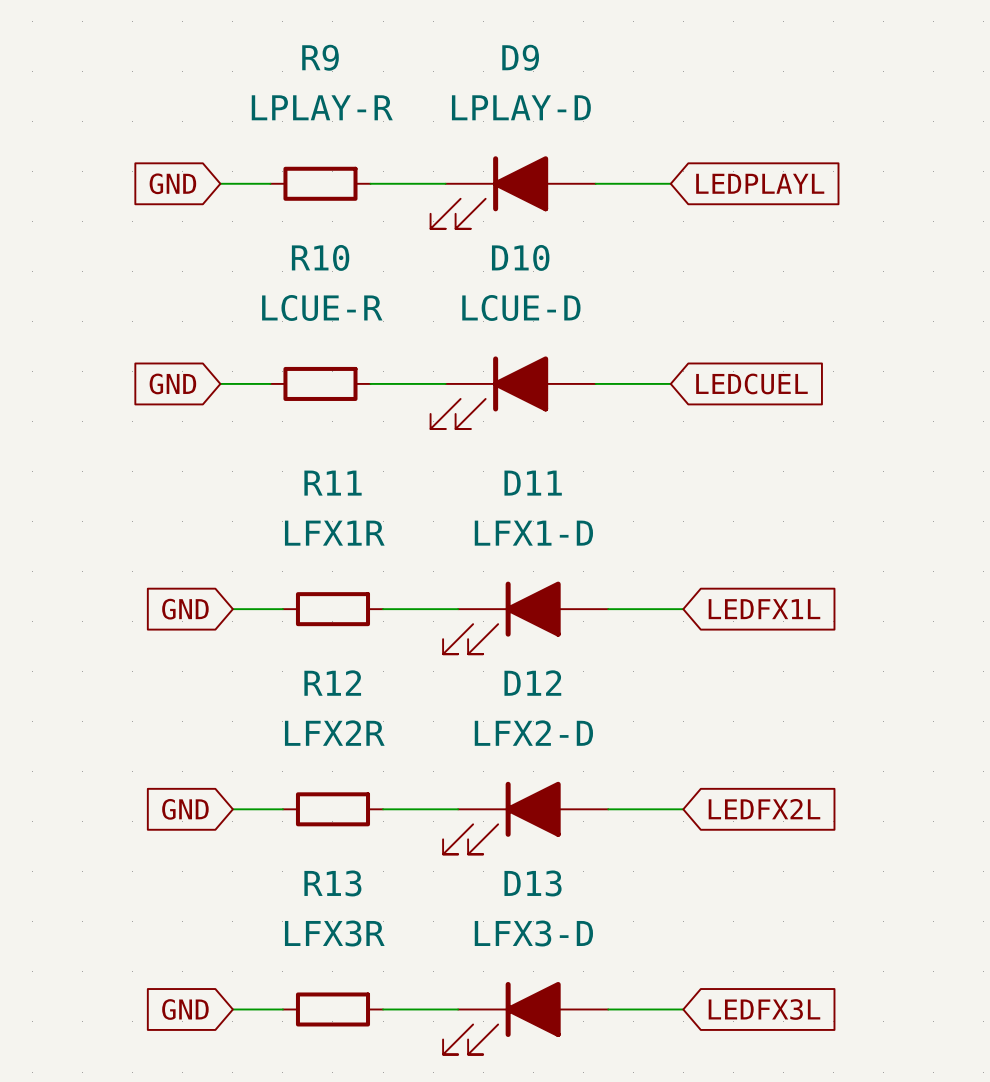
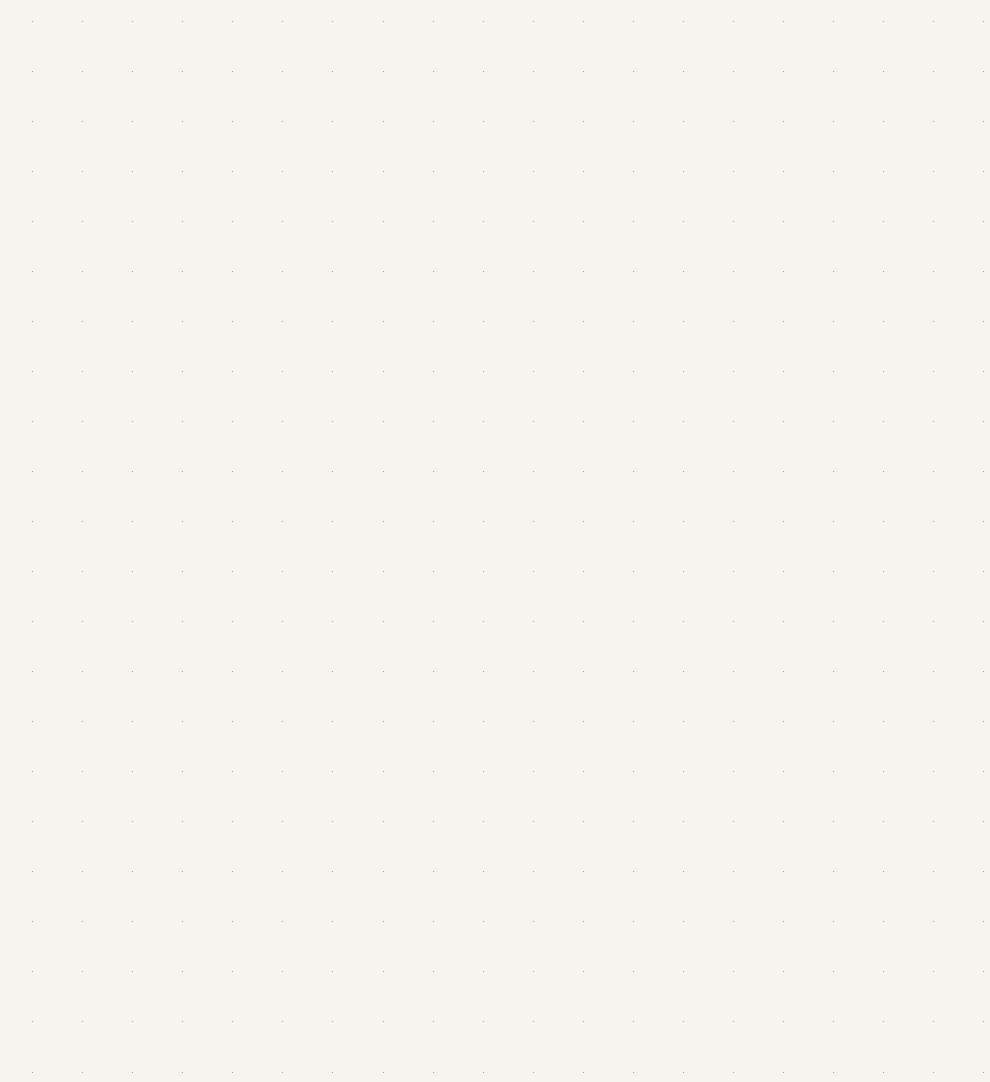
global label: GND (172, 183) -> none
wire: (220, 183) (270, 183) -> none
R9: LPLAY-R (320, 183) -> none
wire: (370, 183) (445, 183) -> none
wire: (595, 183) (670, 183) -> none
global label: LEDPLAYL (760, 183) -> none
D9: LPLAY-D (513, 192) -> none
global label: GND (172, 383) -> none
wire: (220, 383) (270, 383) -> none
R10: LCUE-R (320, 383) -> none
wire: (370, 383) (445, 383) -> none
wire: (595, 383) (670, 383) -> none
global label: LEDCUEL (751, 383) -> none
D10: LCUE-D (513, 392) -> none
global label: GND (185, 609) -> none
wire: (232, 609) (282, 609) -> none
R11: LFX1R (332, 609) -> none
wire: (383, 609) (458, 609) -> none
wire: (608, 609) (683, 609) -> none
global label: LEDFX1L (764, 609) -> none
D11: LFX1-D (525, 617) -> none
global label: GND (185, 809) -> none
wire: (232, 809) (282, 809) -> none
R12: LFX2R (332, 809) -> none
wire: (383, 809) (458, 809) -> none
wire: (608, 809) (683, 809) -> none
global label: LEDFX2L (764, 809) -> none
D12: LFX2-D (525, 818) -> none
global label: GND (185, 1009) -> none
wire: (232, 1009) (282, 1009) -> none
R13: LFX3R (332, 1009) -> none
wire: (383, 1009) (458, 1009) -> none
wire: (608, 1009) (683, 1009) -> none
global label: LEDFX3L (764, 1009) -> none
D13: LFX3-D (525, 1018) -> none

